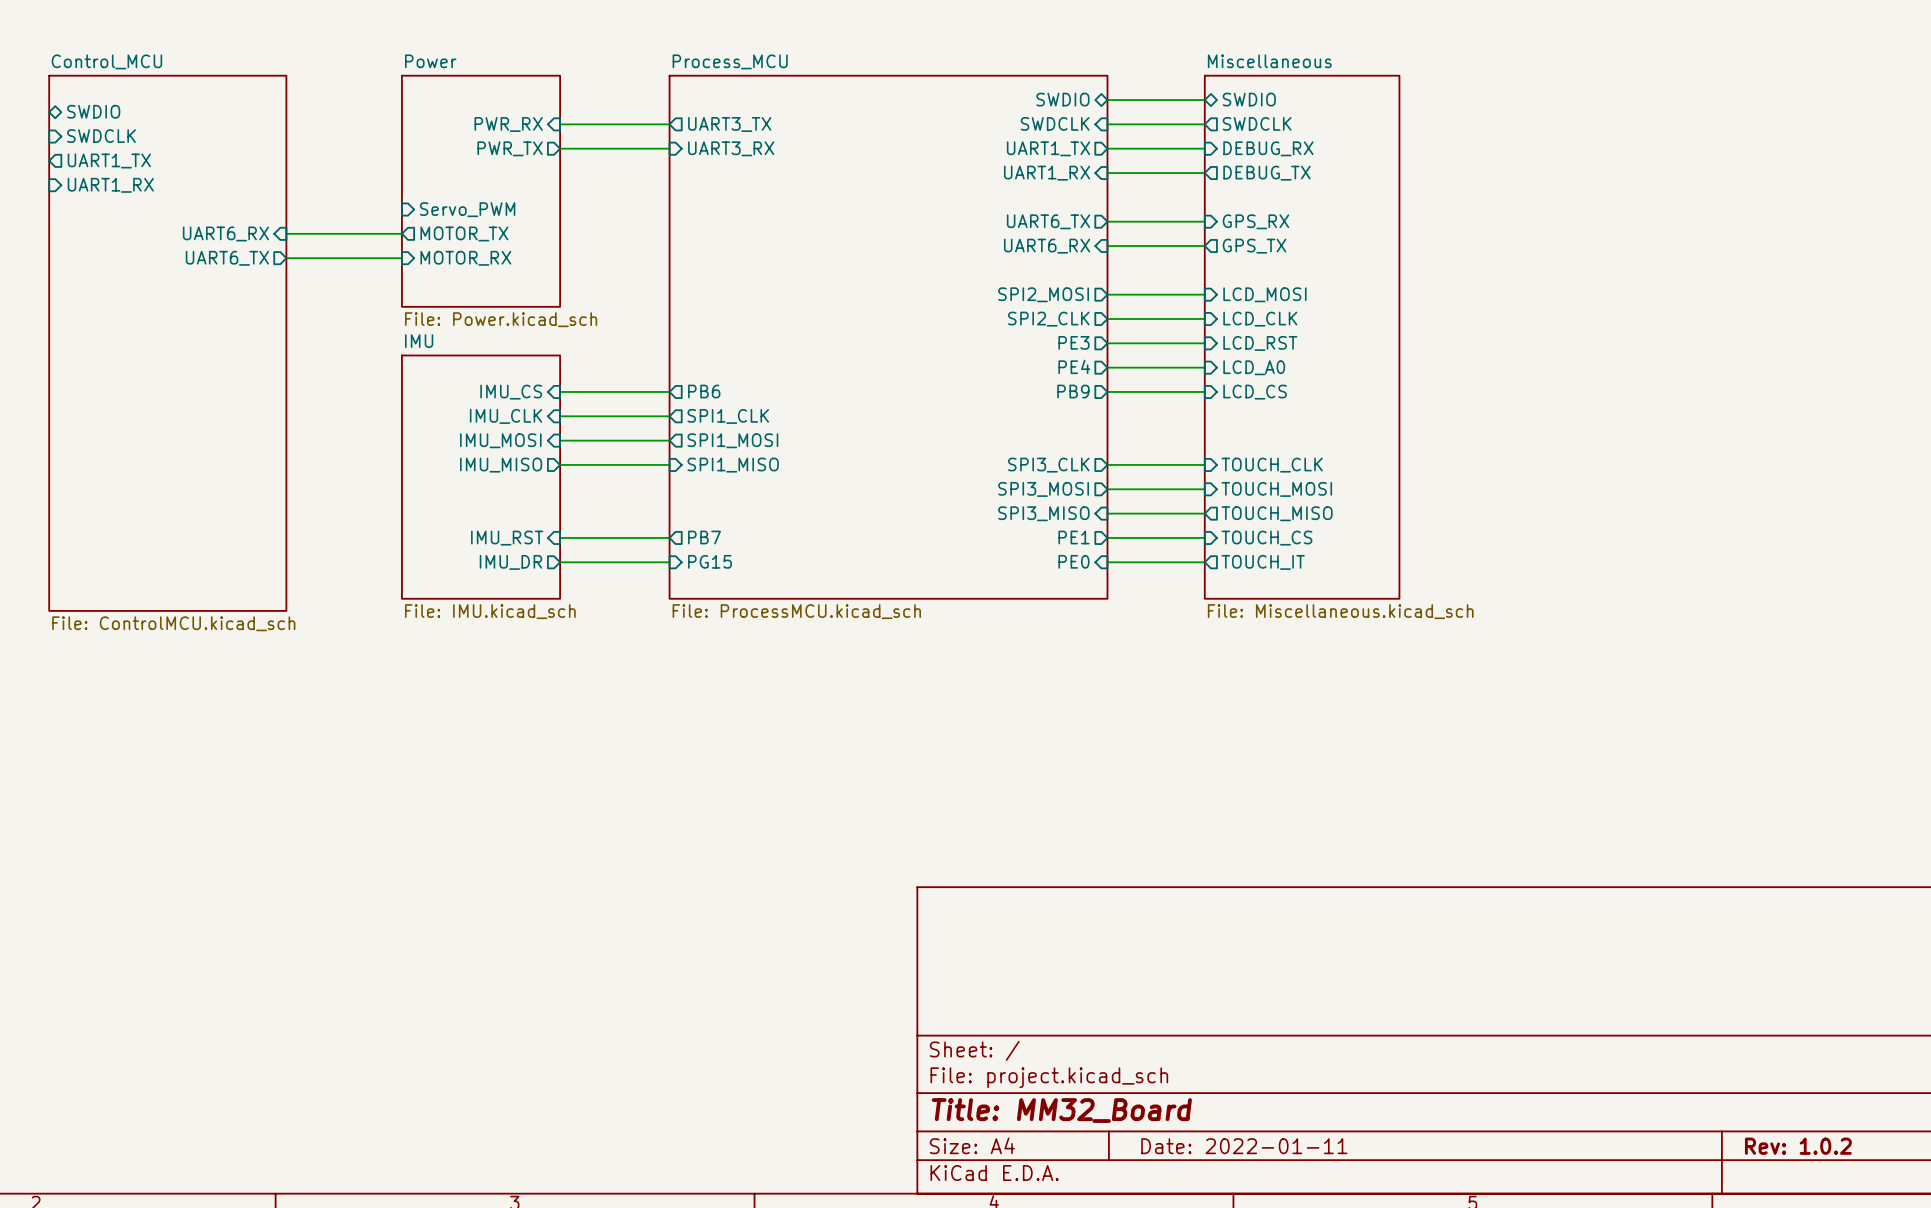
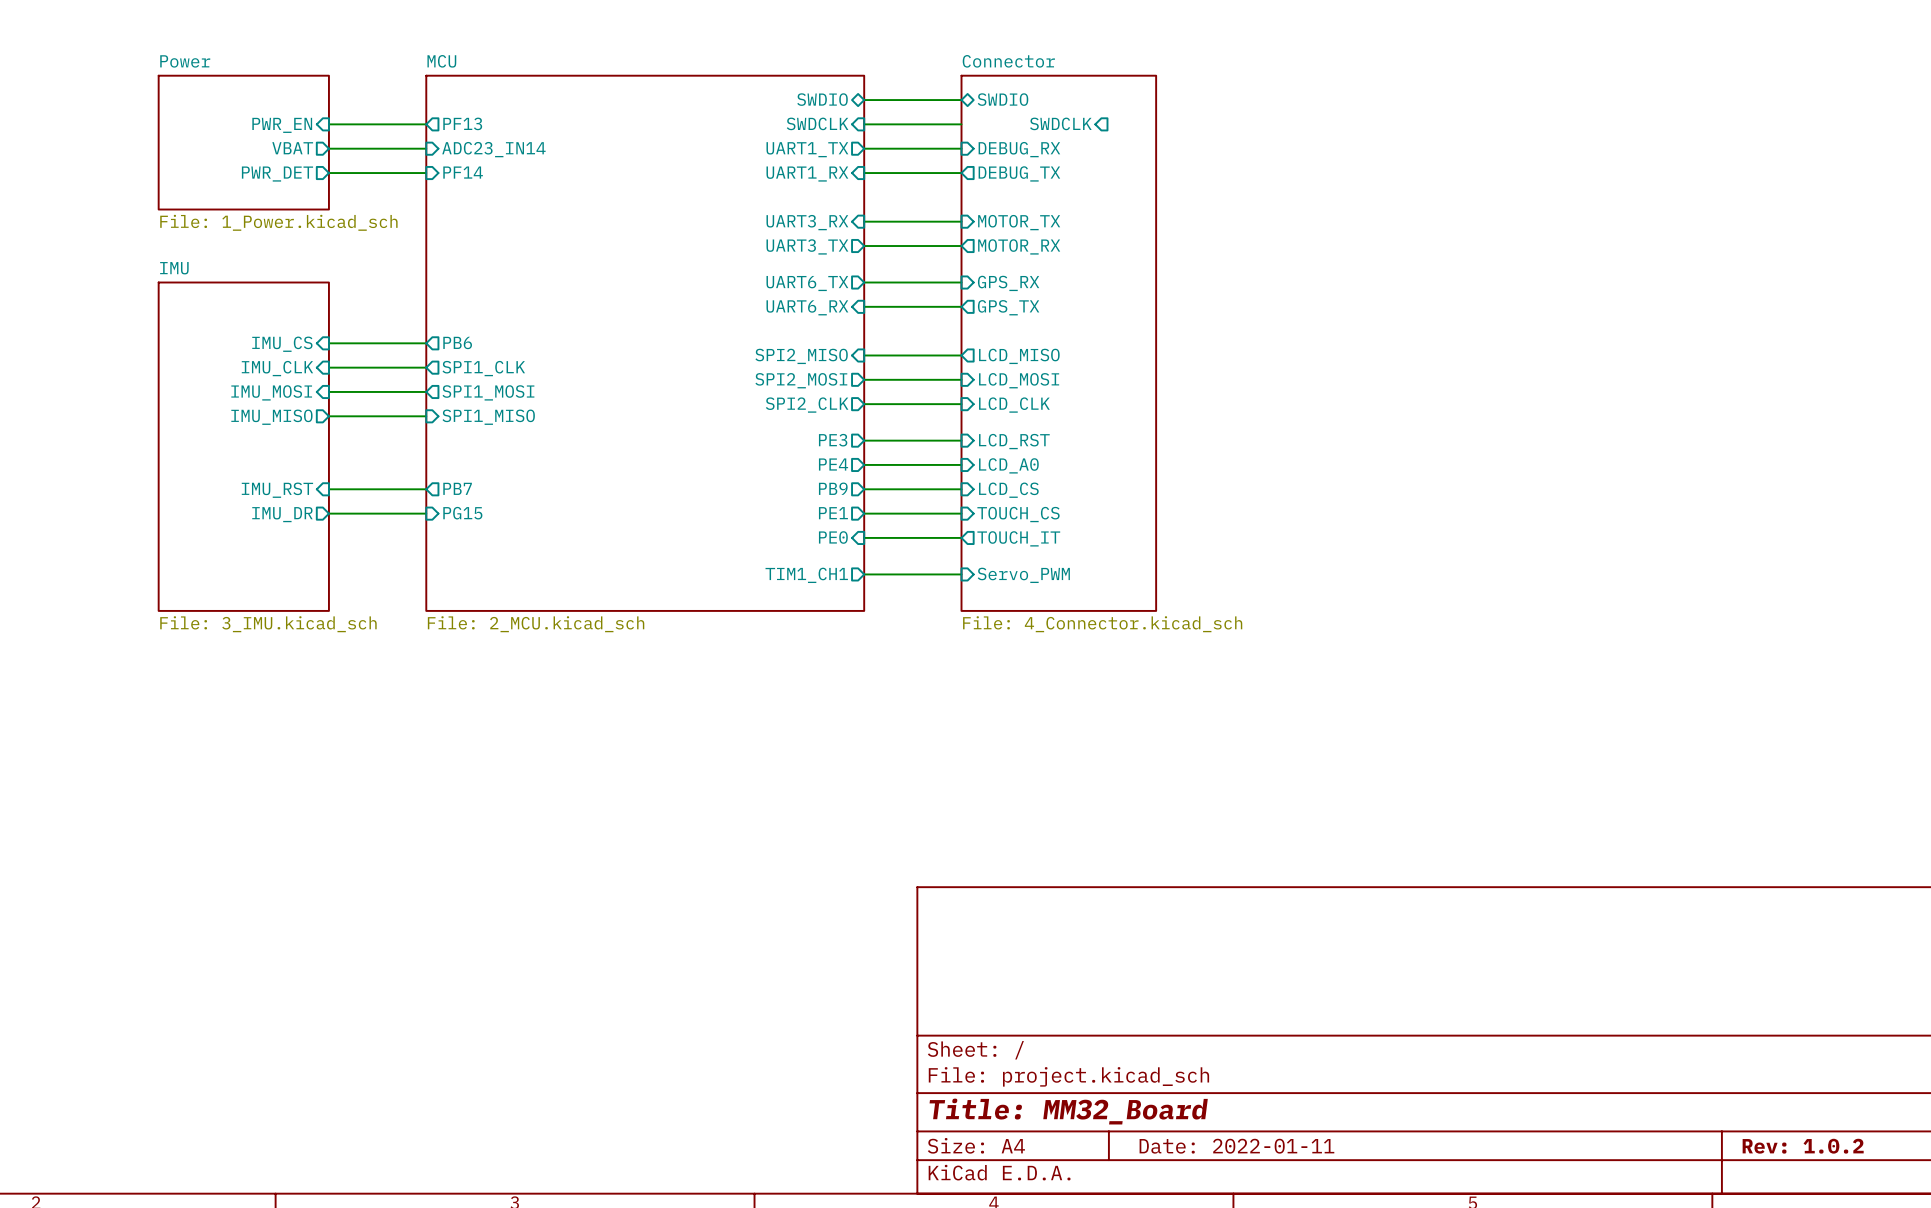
sheet pin: none -> SWDIO (822, 99)
sheet pin rotation: 0° (1062, 99) -> 180° (1003, 99)
sheet pin: SWDIO (1249, 99) -> none
wire: none -> (864, 100) (961, 100)
wire: (1107, 100) (1204, 100) -> none
sheet pin: SWDIO (93, 111) -> none
sheet pin: none -> PF13 (462, 123)
sheet pin: none -> SWDCLK (817, 123)
sheet pin: SWDCLK (1257, 123) -> none
sheet pin: none -> PWR_EN (282, 125)
wire: none -> (328, 124) (426, 124)
sheet pin: PWR_RX (508, 124) -> none
wire: (560, 124) (669, 124) -> none
sheet pin rotation: 0° (729, 124) -> 180° (807, 246)
sheet pin position: UART3_TX (729, 124) -> UART3_TX (807, 246)
wire: none -> (864, 124) (961, 124)
wire: (1107, 124) (1204, 124) -> none
sheet pin: SWDCLK (101, 136) -> none
sheet Power: none -> File: 1_Power.kicad_sch (243, 142)
sheet pin: none -> VBAT (292, 148)
wire: none -> (328, 148) (426, 148)
sheet pin: none -> ADC23_IN14 (493, 149)
sheet pin: PWR_TX (510, 148) -> none
wire: (560, 148) (669, 148) -> none
sheet pin rotation: 0° (731, 148) -> 180° (807, 222)
sheet pin: none -> UART1_TX (807, 149)
wire: none -> (864, 148) (961, 148)
sheet pin: none -> DEBUG_RX (1019, 149)
sheet pin: UART1_TX (1048, 148) -> none
wire: (1107, 148) (1204, 148) -> none
sheet pin: DEBUG_RX (1268, 148) -> none
sheet pin: UART1_TX (109, 160) -> none
sheet pin: none -> PF14 (463, 172)
sheet pin: none -> PWR_DET (277, 174)
wire: none -> (328, 173) (426, 173)
sheet pin: none -> UART1_RX (807, 174)
wire: none -> (864, 173) (961, 173)
sheet pin: none -> DEBUG_TX (1019, 173)
sheet pin: UART1_RX (1047, 173) -> none
wire: (1107, 173) (1204, 173) -> none
sheet pin: DEBUG_TX (1266, 173) -> none
sheet pin: UART1_RX (110, 185) -> none
sheet Power: File: Power.kicad_sch (481, 191) -> none
sheet pin: Servo_PWM (467, 209) -> none
wire: none -> (864, 221) (961, 221)
sheet pin: none -> MOTOR_TX (1019, 222)
sheet pin: UART6_TX (1048, 221) -> none
wire: (1107, 221) (1204, 221) -> none
sheet pin: GPS_RX (1255, 221) -> none
sheet pin: UART6_RX (225, 233) -> none
wire: (286, 233) (401, 233) -> none
sheet pin: MOTOR_TX (464, 233) -> none
wire: none -> (864, 246) (961, 246)
sheet pin: none -> MOTOR_RX (1019, 246)
sheet pin: UART6_RX (1047, 246) -> none
wire: (1107, 246) (1204, 246) -> none
sheet pin: GPS_TX (1254, 246) -> none
sheet pin: UART6_TX (227, 258) -> none
wire: (286, 258) (401, 258) -> none
sheet pin: MOTOR_RX (465, 258) -> none
sheet pin: none -> UART6_TX (807, 283)
wire: none -> (864, 282) (961, 282)
sheet pin: none -> GPS_RX (1008, 283)
sheet pin: SPI2_MOSI (1043, 294) -> none
wire: (1107, 294) (1204, 294) -> none
sheet pin: LCD_MOSI (1264, 294) -> none
sheet pin: none -> UART6_RX (807, 307)
wire: none -> (864, 306) (961, 306)
sheet pin: none -> GPS_TX (1008, 307)
wire: (1107, 318) (1204, 318) -> none
sheet pin: SPI2_CLK (1048, 319) -> none
sheet pin: LCD_CLK (1260, 319) -> none
sheet Process_MCU: File: ProcessMCU.kicad_sch (888, 337) -> none
sheet Miscellaneous: File: Miscellaneous.kicad_sch (1302, 337) -> none
sheet pin: none -> PB6 (457, 342)
sheet pin: PE3 (1073, 342) -> none
sheet Control_MCU: File: ControlMCU.kicad_sch (167, 343) -> none
wire: none -> (328, 343) (426, 343)
sheet MCU: none -> File: 2_MCU.kicad_sch (645, 343)
sheet Connector: none -> File: 4_Connector.kicad_sch (1058, 343)
wire: (1107, 343) (1204, 343) -> none
sheet pin: LCD_RST (1260, 343) -> none
sheet pin: none -> SPI2_MISO (801, 356)
wire: none -> (864, 355) (961, 355)
sheet pin: none -> LCD_MISO (1019, 356)
sheet pin: PE4 (1074, 366) -> none
wire: none -> (328, 367) (426, 367)
sheet pin: none -> SPI1_CLK (483, 368)
wire: (1107, 367) (1204, 367) -> none
sheet pin: LCD_A0 (1254, 367) -> none
sheet pin: none -> SPI2_MOSI (801, 380)
wire: none -> (864, 379) (961, 379)
sheet pin: none -> LCD_MOSI (1019, 380)
wire: none -> (328, 391) (426, 391)
wire: (560, 391) (669, 391) -> none
sheet pin: PB6 (704, 391) -> none
sheet pin: PB9 (1073, 391) -> none
wire: (1107, 391) (1204, 391) -> none
sheet pin: none -> SPI1_MOSI (488, 392)
sheet pin position: IMU_CS (511, 392) -> IMU_CS (282, 344)
sheet pin: LCD_CS (1255, 392) -> none
wire: none -> (864, 404) (961, 404)
sheet pin: none -> LCD_CLK (1014, 405)
wire: none -> (328, 416) (426, 416)
sheet pin: none -> SPI1_MISO (488, 417)
sheet pin position: IMU_CLK (506, 416) -> IMU_CLK (277, 368)
wire: (560, 416) (669, 416) -> none
sheet pin: SPI1_CLK (728, 416) -> SPI2_CLK (807, 405)
sheet pin position: IMU_MOSI (500, 440) -> IMU_MOSI (271, 392)
wire: (560, 440) (669, 440) -> none
sheet pin: SPI1_MOSI (732, 440) -> none
sheet pin: none -> PE3 (833, 440)
wire: none -> (864, 440) (961, 440)
sheet pin: none -> LCD_RST (1014, 441)
sheet IMU: none -> File: 3_IMU.kicad_sch (243, 446)
wire: (560, 464) (669, 464) -> none
sheet pin: none -> PE4 (833, 464)
wire: none -> (864, 464) (961, 464)
wire: (1107, 464) (1204, 464) -> none
sheet pin position: IMU_MISO (501, 465) -> IMU_MISO (271, 417)
sheet pin: SPI1_MISO (733, 465) -> none
sheet pin: none -> LCD_A0 (1008, 465)
sheet pin: SPI3_CLK (1048, 465) -> none
sheet pin: TOUCH_CLK (1272, 465) -> none
sheet IMU: File: IMU.kicad_sch (481, 477) -> none
sheet pin: none -> PB7 (457, 488)
sheet pin: none -> PB9 (833, 488)
wire: none -> (328, 489) (426, 489)
wire: none -> (864, 489) (961, 489)
sheet pin: none -> LCD_CS (1008, 490)
sheet pin: SPI3_MOSI (1043, 489) -> none
wire: (1107, 489) (1204, 489) -> none
sheet pin: TOUCH_MOSI (1276, 489) -> none
wire: none -> (328, 513) (426, 513)
sheet pin: none -> PG15 (462, 513)
sheet pin: none -> PE1 (833, 513)
wire: none -> (864, 513) (961, 513)
sheet pin: none -> TOUCH_CS (1018, 514)
sheet pin: SPI3_MISO (1043, 513) -> none
wire: (1107, 513) (1204, 513) -> none
sheet pin: TOUCH_MISO (1277, 513) -> none
wire: (560, 537) (669, 537) -> none
sheet pin: PB7 (704, 537) -> none
sheet pin: none -> PE0 (833, 537)
wire: none -> (864, 537) (961, 537)
sheet pin: PE1 (1073, 537) -> none
wire: (1107, 537) (1204, 537) -> none
sheet pin position: IMU_RST (507, 538) -> IMU_RST (277, 490)
sheet pin: none -> TOUCH_IT (1018, 538)
sheet pin: TOUCH_CS (1266, 538) -> none
sheet pin: PG15 (710, 561) -> none
sheet pin: PE0 (1073, 561) -> none
sheet pin position: IMU_DR (510, 562) -> IMU_DR (282, 514)
wire: (560, 562) (669, 562) -> none
wire: (1107, 562) (1204, 562) -> none
sheet pin: TOUCH_IT (1263, 562) -> none
sheet pin: none -> TIM1_CH1 (806, 575)
wire: none -> (864, 574) (961, 574)
sheet pin: none -> Servo_PWM (1023, 575)

